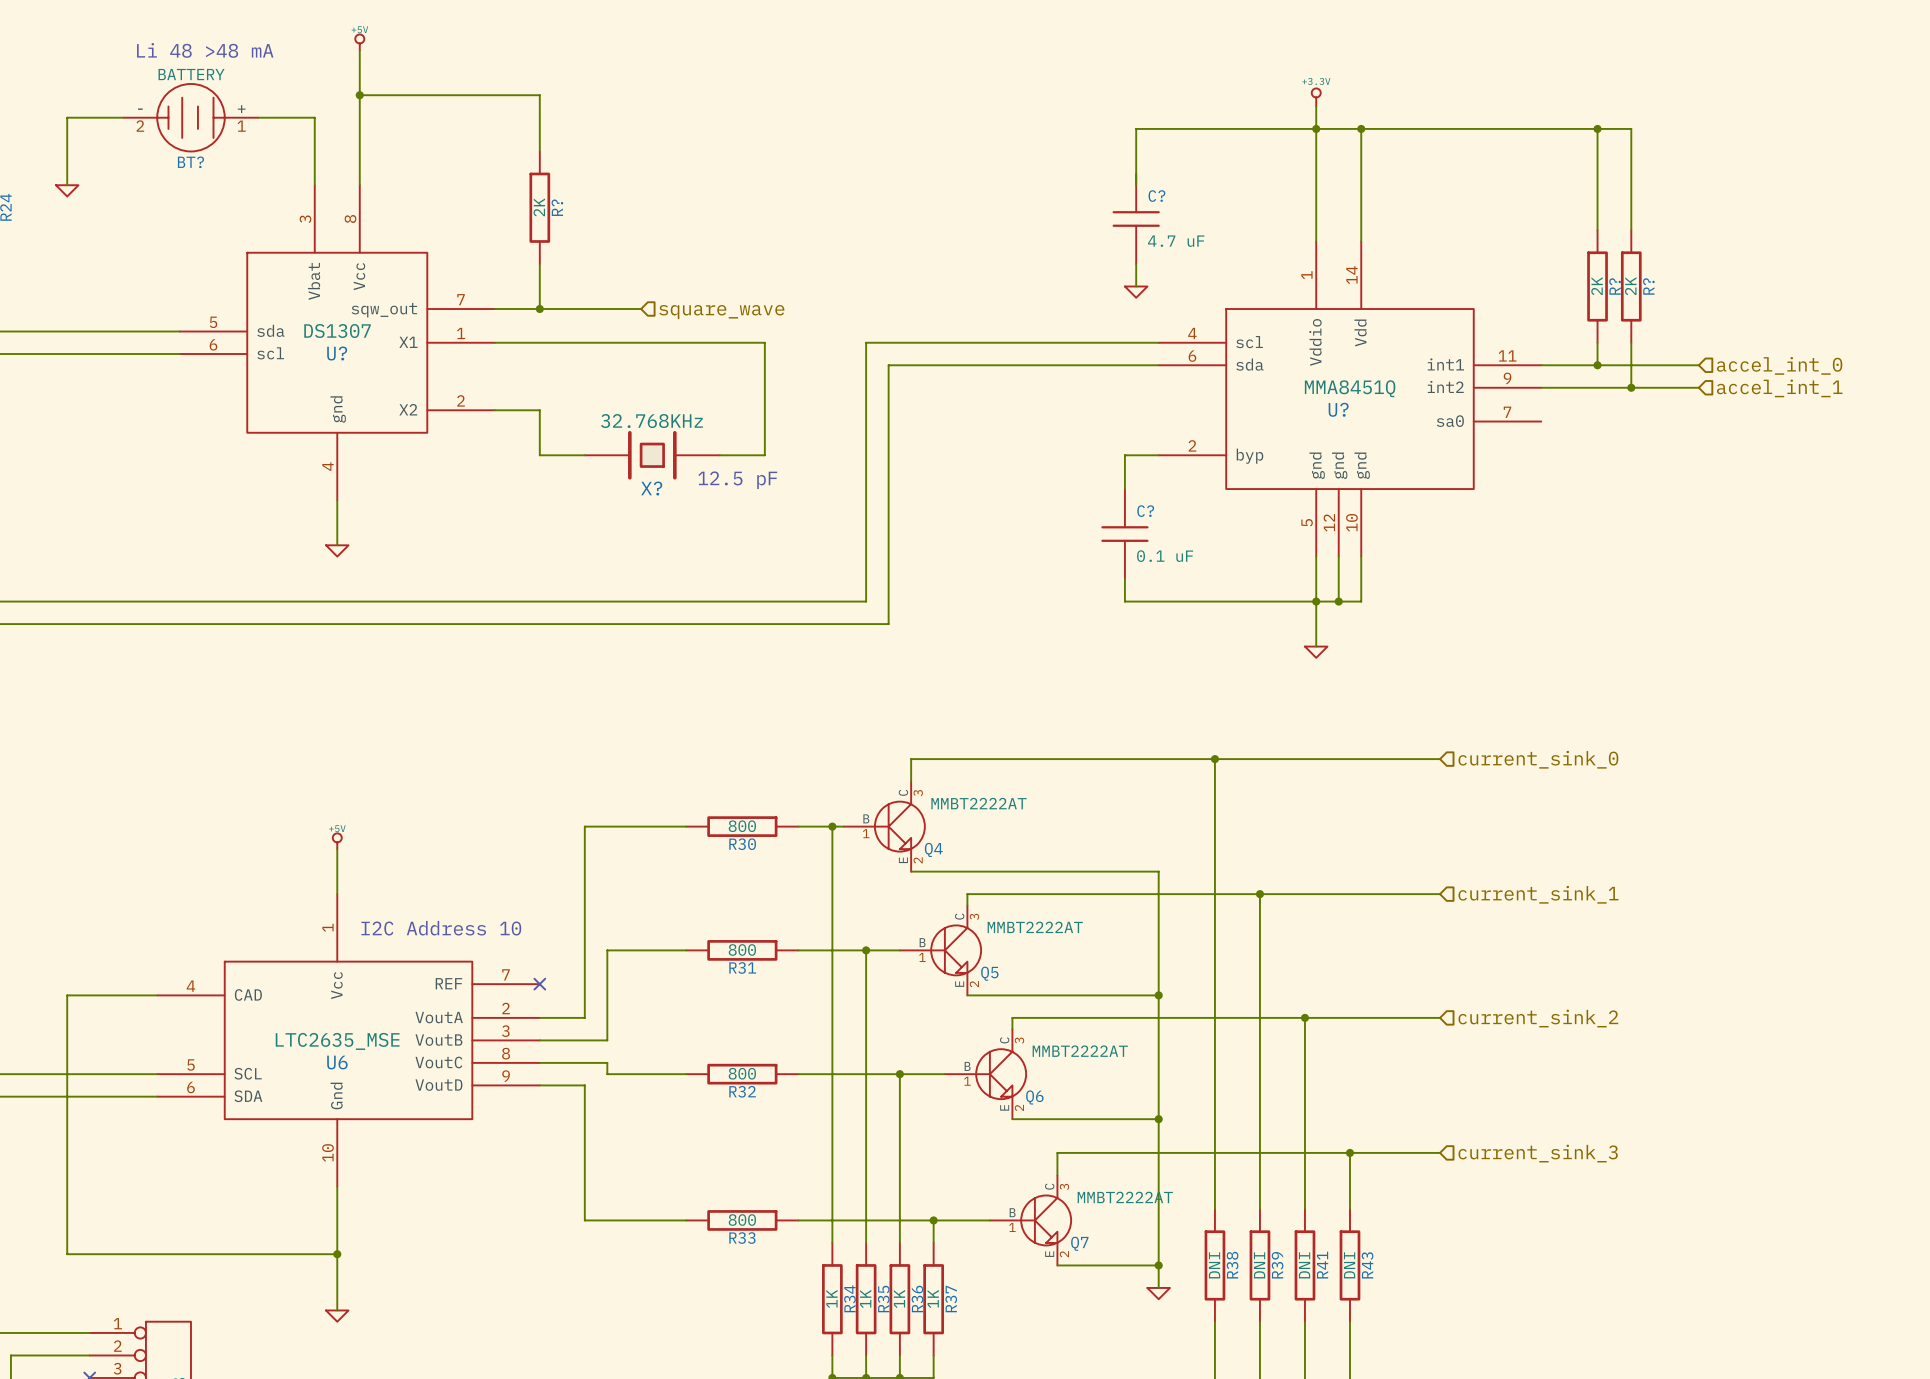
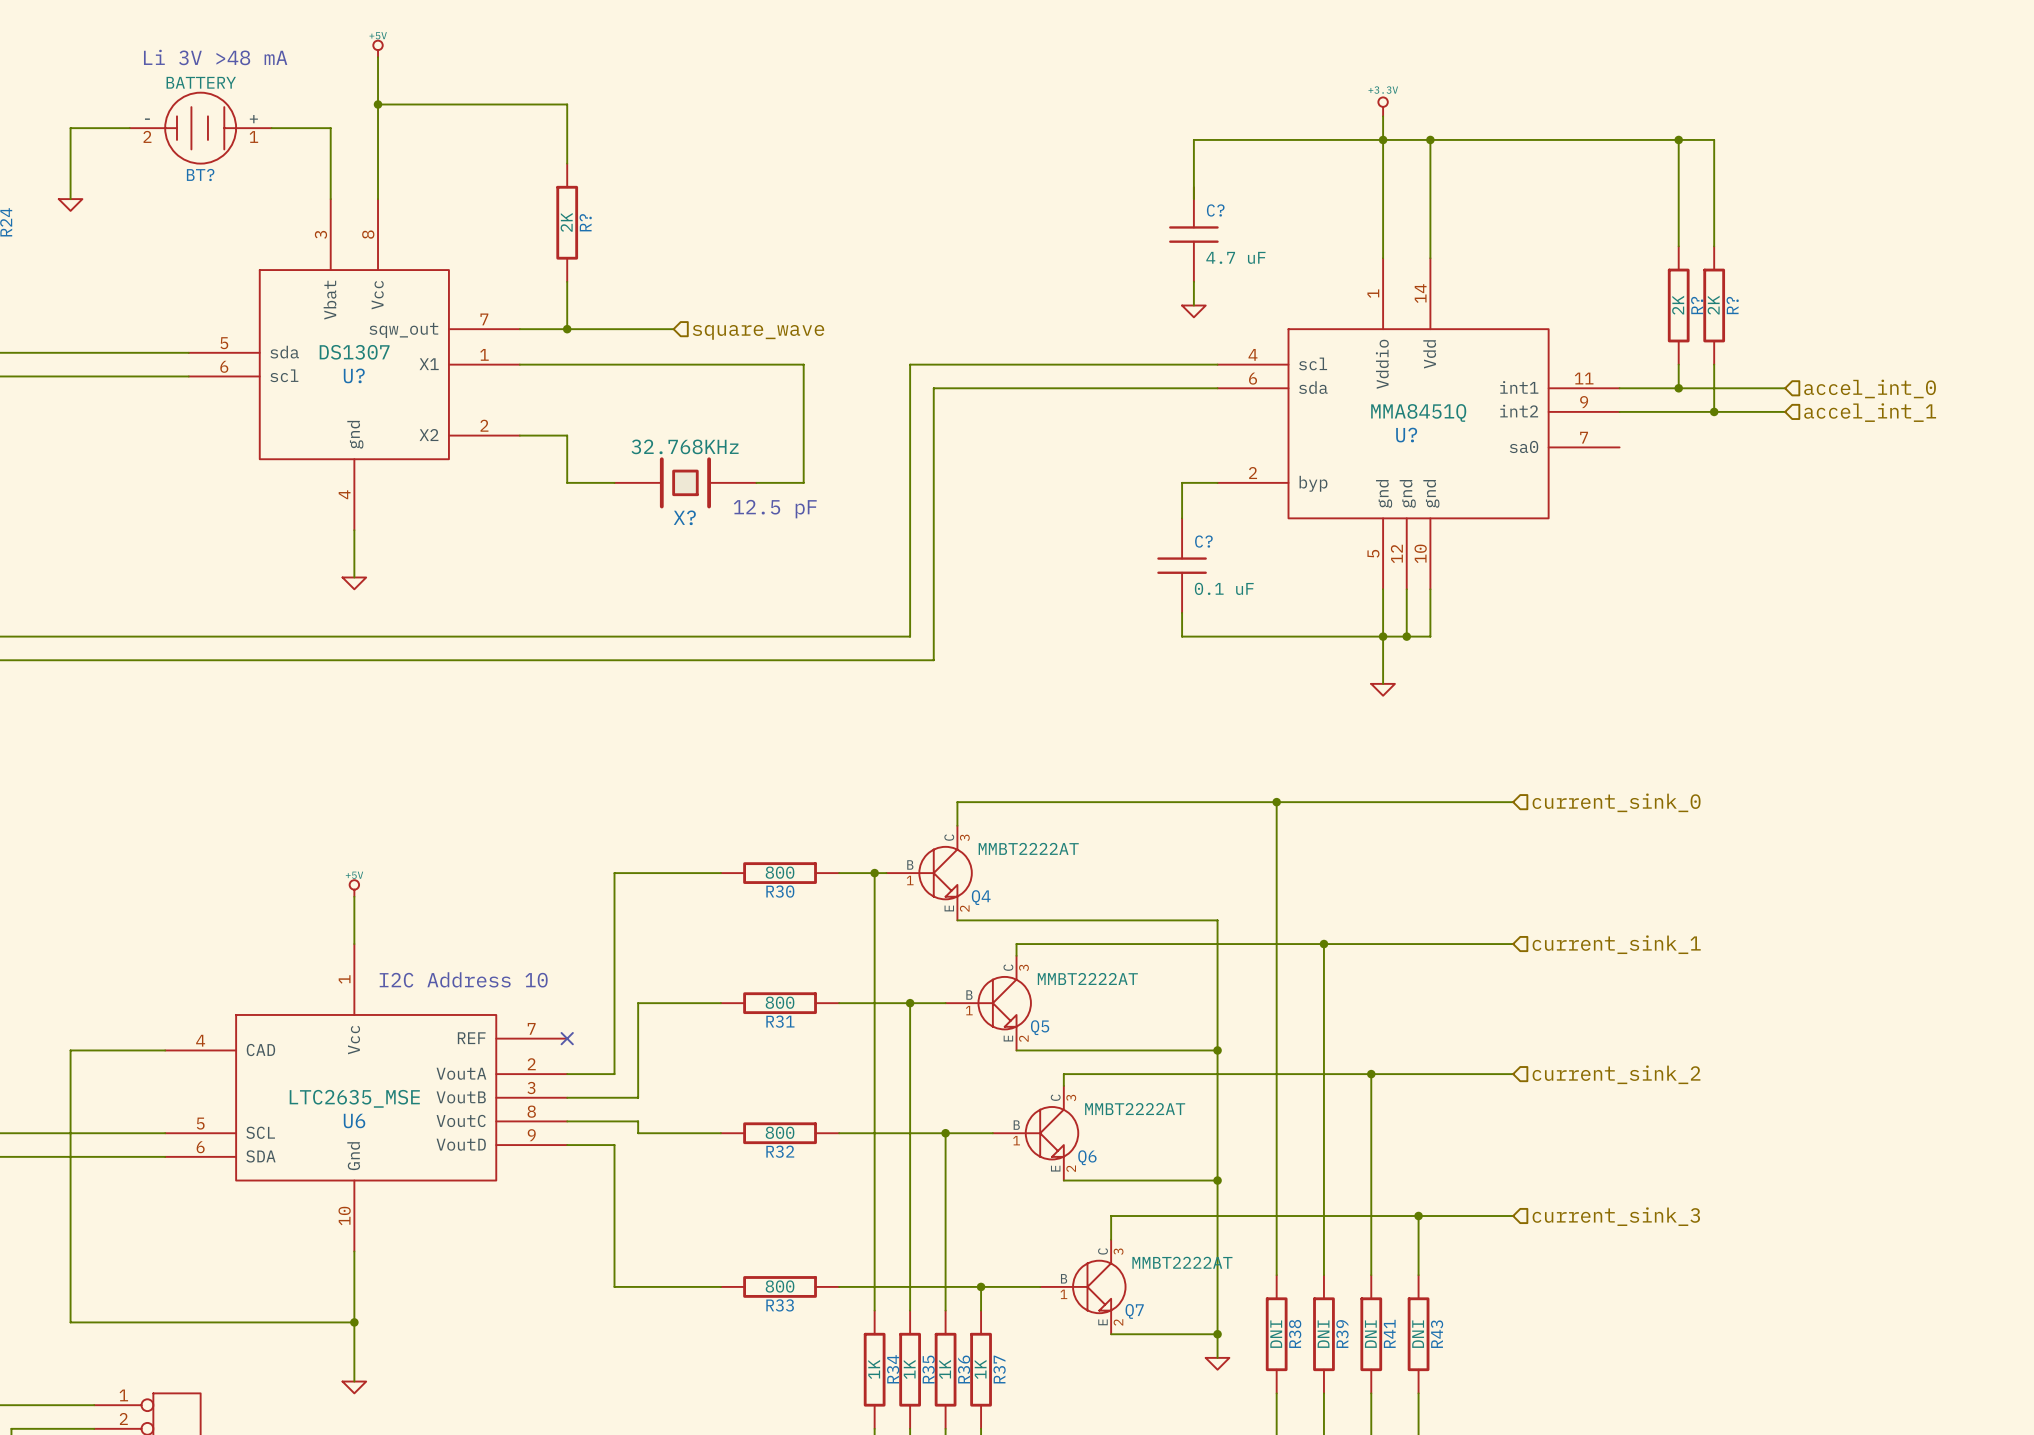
text: Li 48 >48 mA (205, 50) -> Li 3V >48 mA (215, 57)

